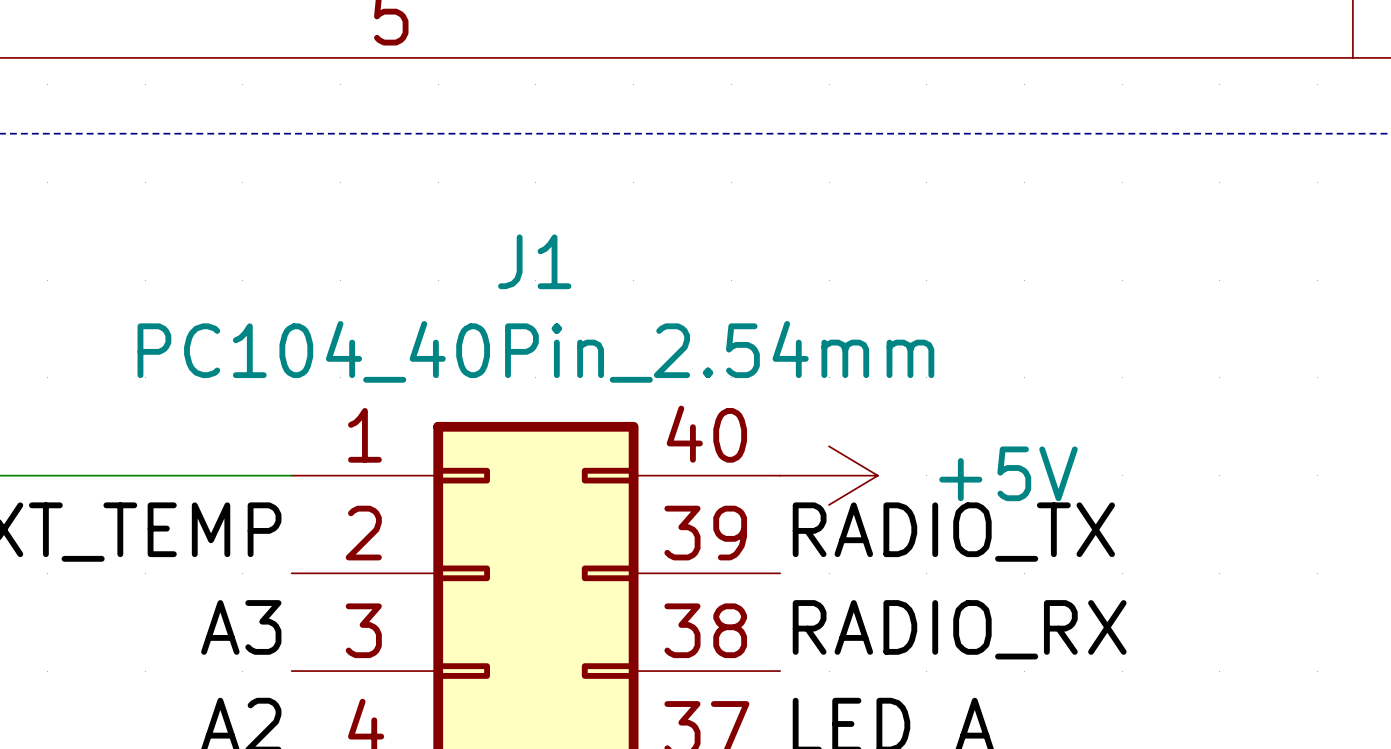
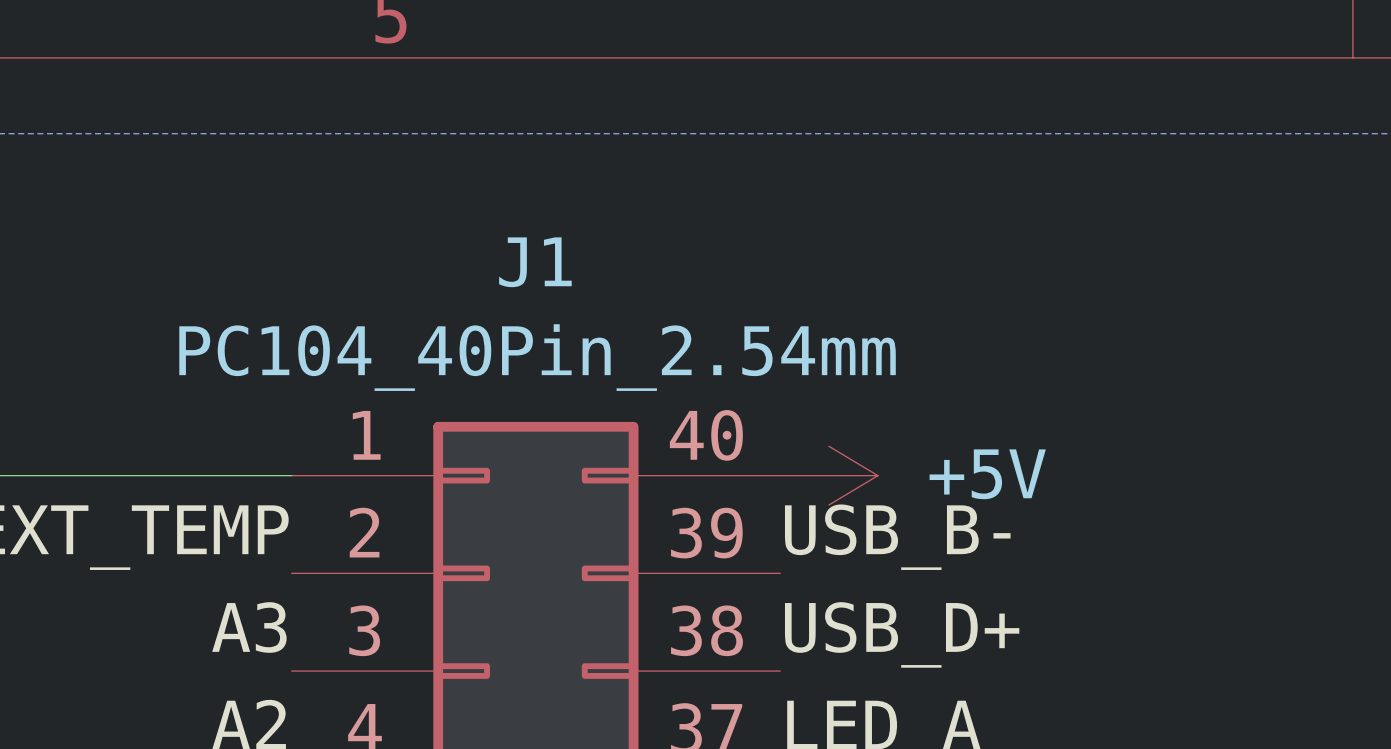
label: RADIO_TX (953, 532) -> USB_B- (897, 537)
label: RADIO_RX (959, 629) -> USB_D+ (902, 634)

